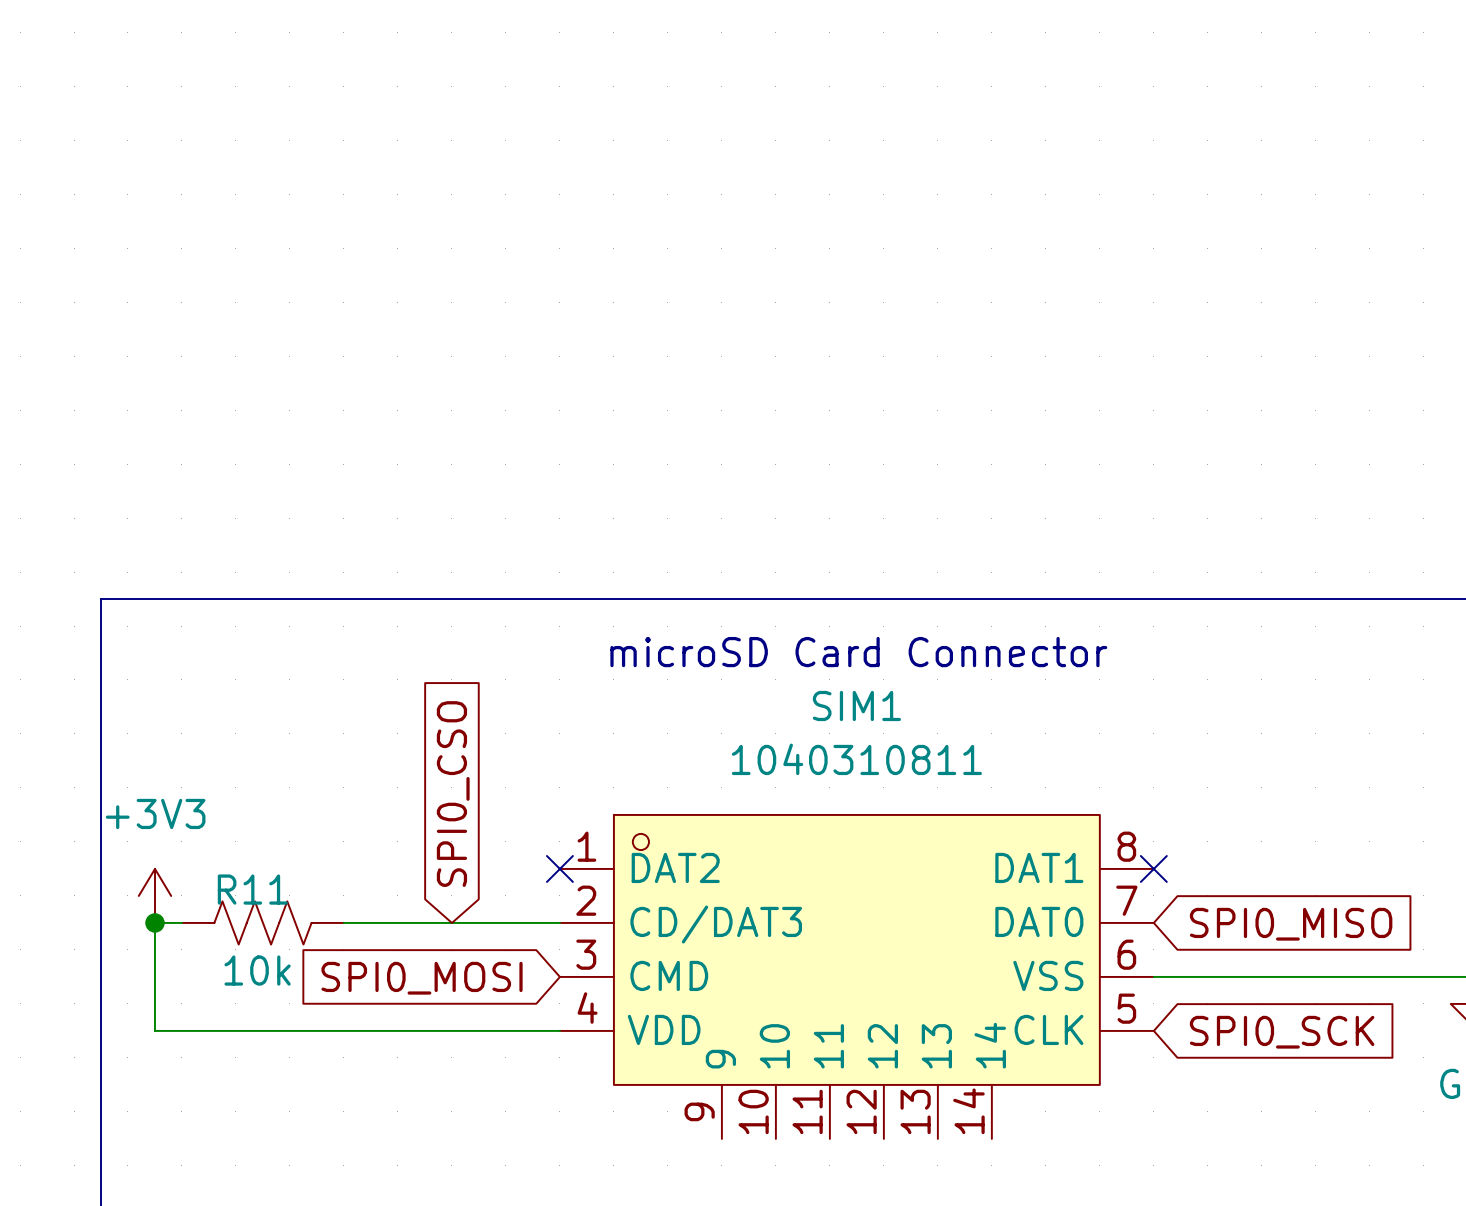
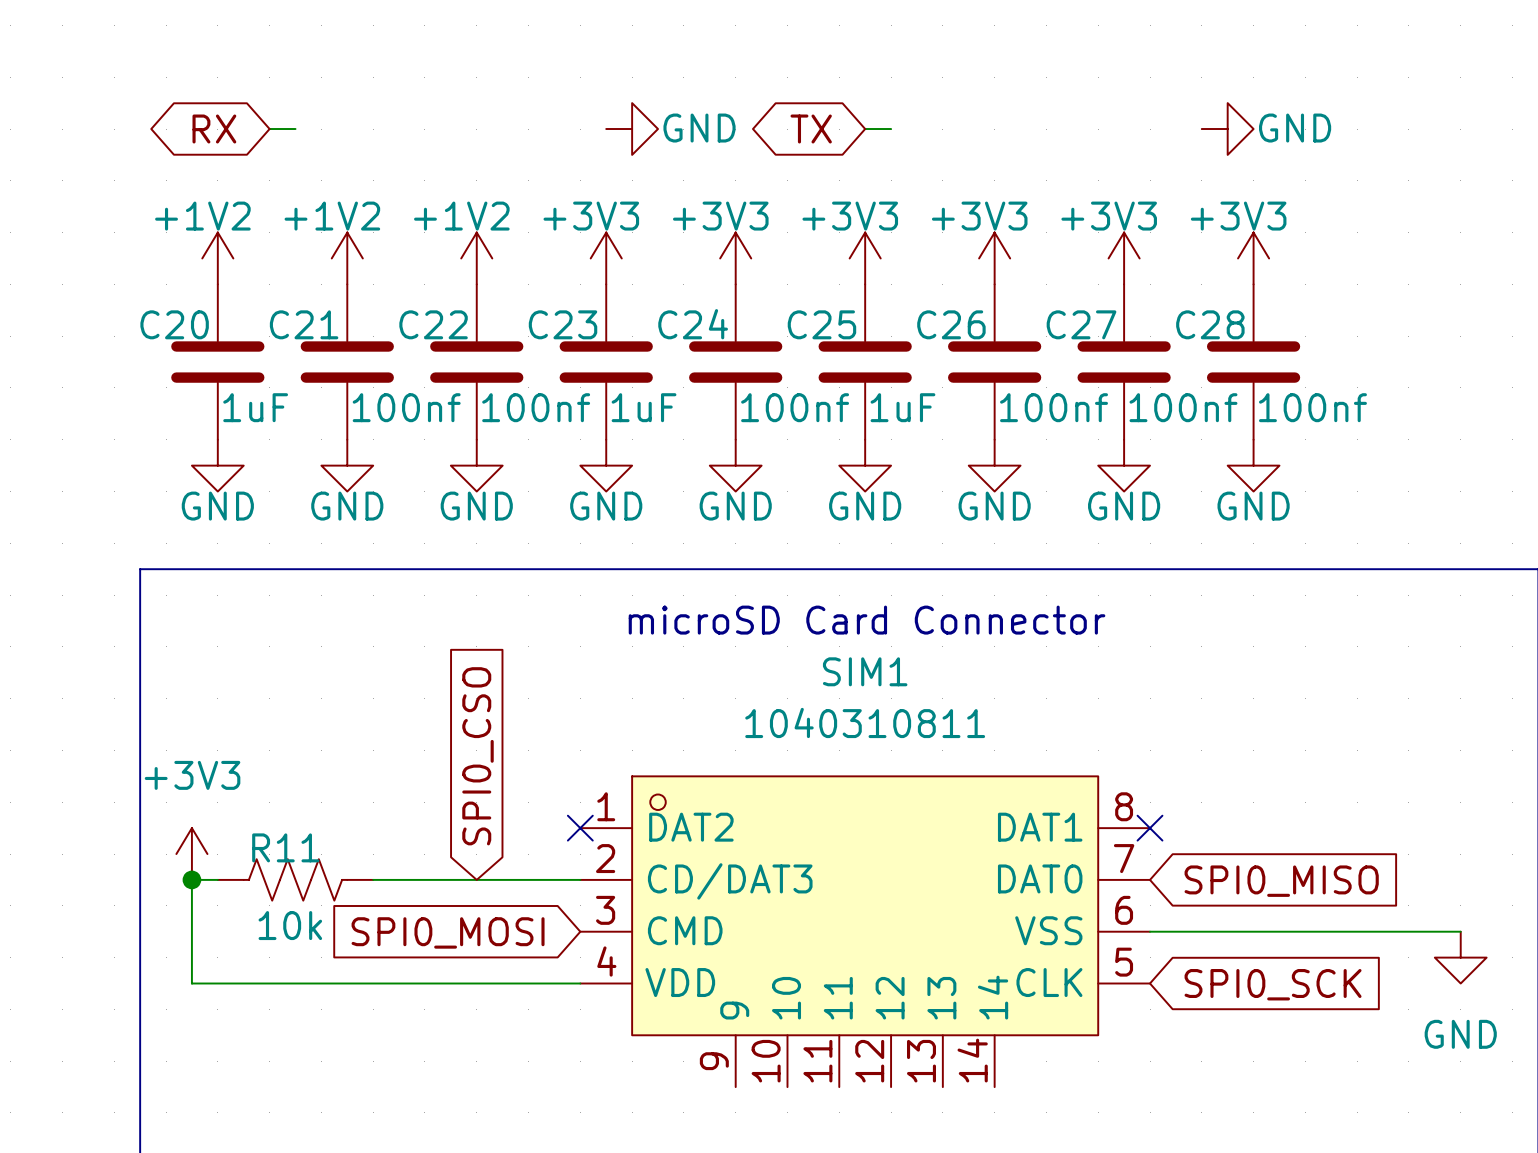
global label: none -> RX (214, 129)
wire: none -> (269, 129) (295, 129)
power symbol: none -> GND (632, 129)
global label: none -> TX (811, 129)
wire: none -> (865, 129) (891, 129)
power symbol: none -> GND (1227, 129)
power symbol: none -> +1V2 (217, 258)
power symbol: none -> +1V2 (347, 258)
power symbol: none -> +1V2 (476, 258)
power symbol: none -> +3V3 (606, 258)
power symbol: none -> +3V3 (735, 258)
power symbol: none -> +3V3 (865, 258)
power symbol: none -> +3V3 (994, 258)
power symbol: none -> +3V3 (1124, 258)
power symbol: none -> +3V3 (1253, 258)
C20: none -> 1uF (217, 362)
C21: none -> 100nf (347, 362)
C22: none -> 100nf (476, 362)
C23: none -> 1uF (606, 362)
C24: none -> 100nf (735, 362)
C25: none -> 1uF (865, 362)
C26: none -> 100nf (994, 362)
C27: none -> 100nf (1124, 362)
C28: none -> 100nf (1253, 362)
power symbol: none -> GND (217, 465)
power symbol: none -> GND (347, 465)
power symbol: none -> GND (476, 465)
power symbol: none -> GND (606, 465)
power symbol: none -> GND (735, 465)
power symbol: none -> GND (865, 465)
power symbol: none -> GND (994, 465)
power symbol: none -> GND (1124, 465)
power symbol: none -> GND (1253, 465)

